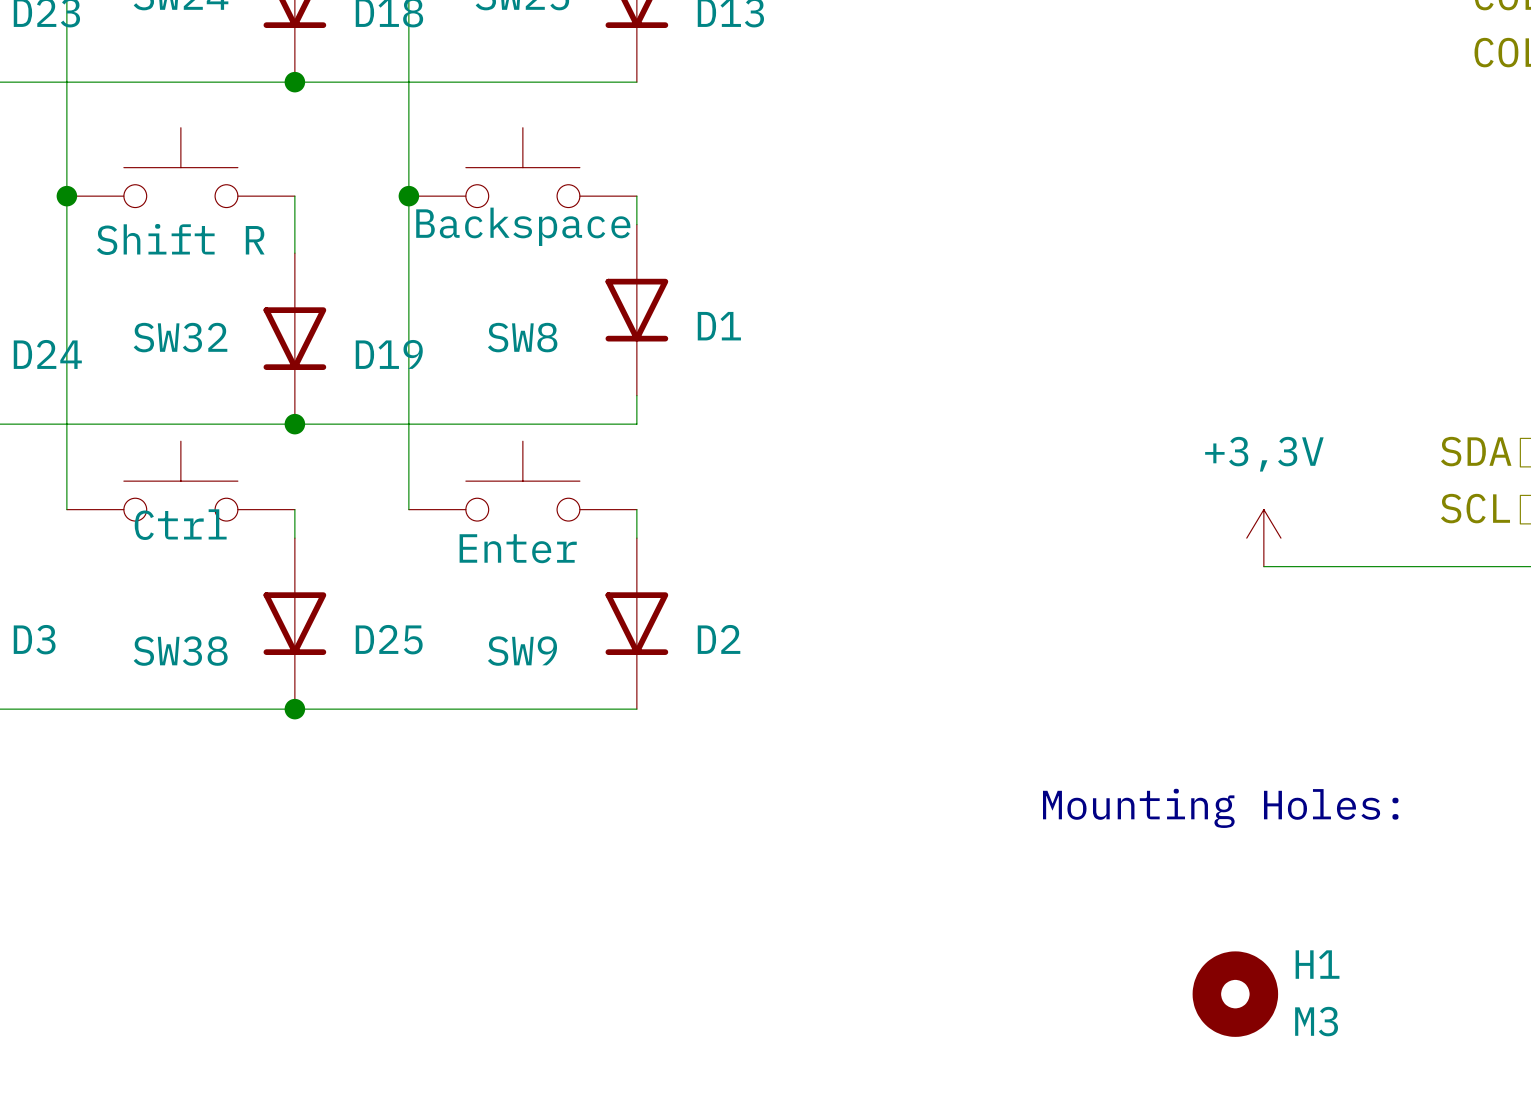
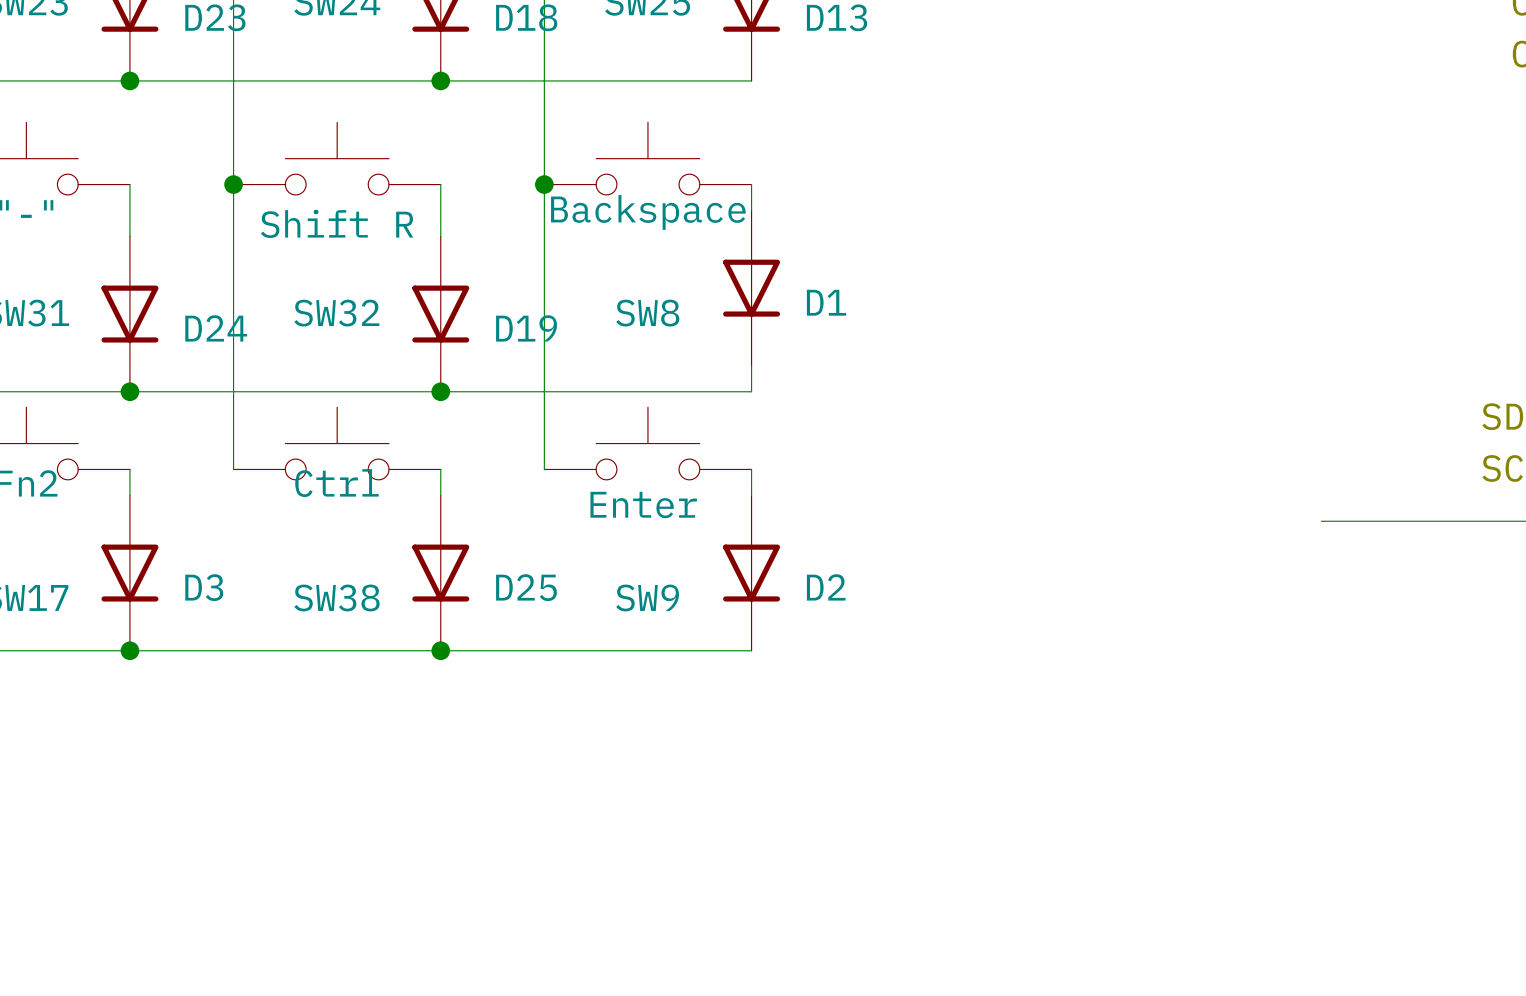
power symbol: +3,3V (1263, 538) -> none
text: Mounting Holes: (1220, 808) -> none
H1: M3 (1235, 994) -> none

